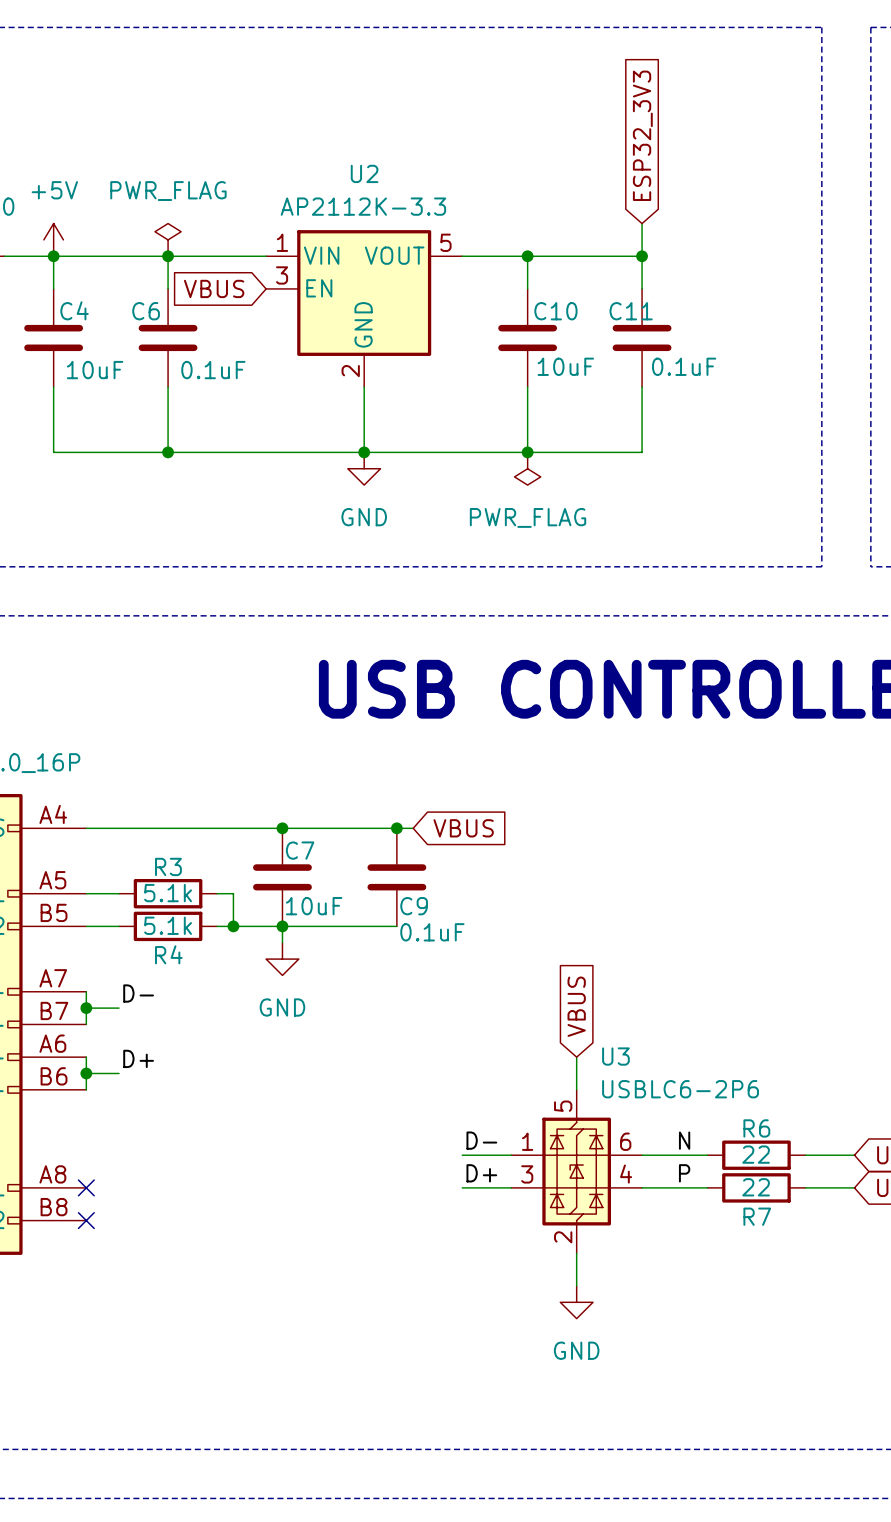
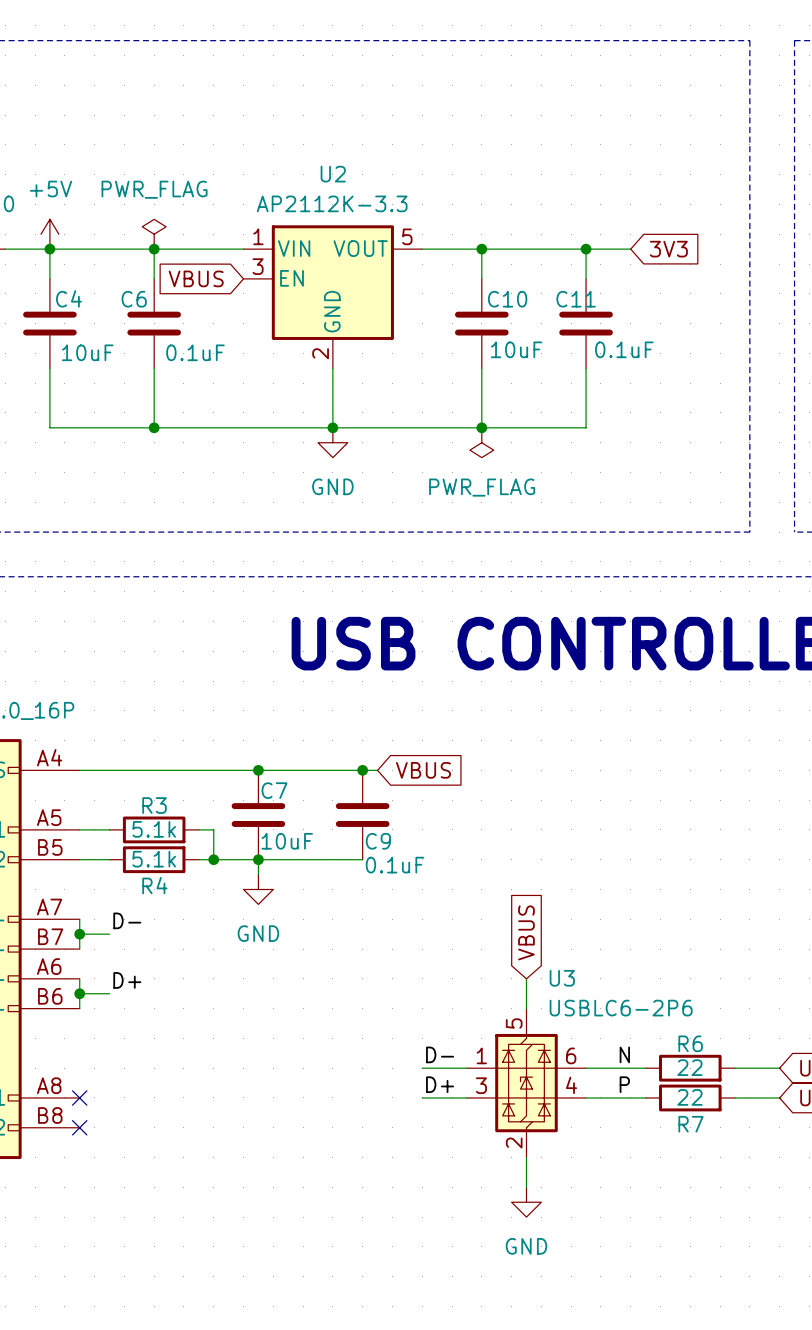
global label: ESP32_3V3 (642, 135) -> none
wire: (642, 223) (642, 256) -> (630, 249) (586, 249)
global label: none -> 3V3 (668, 249)

